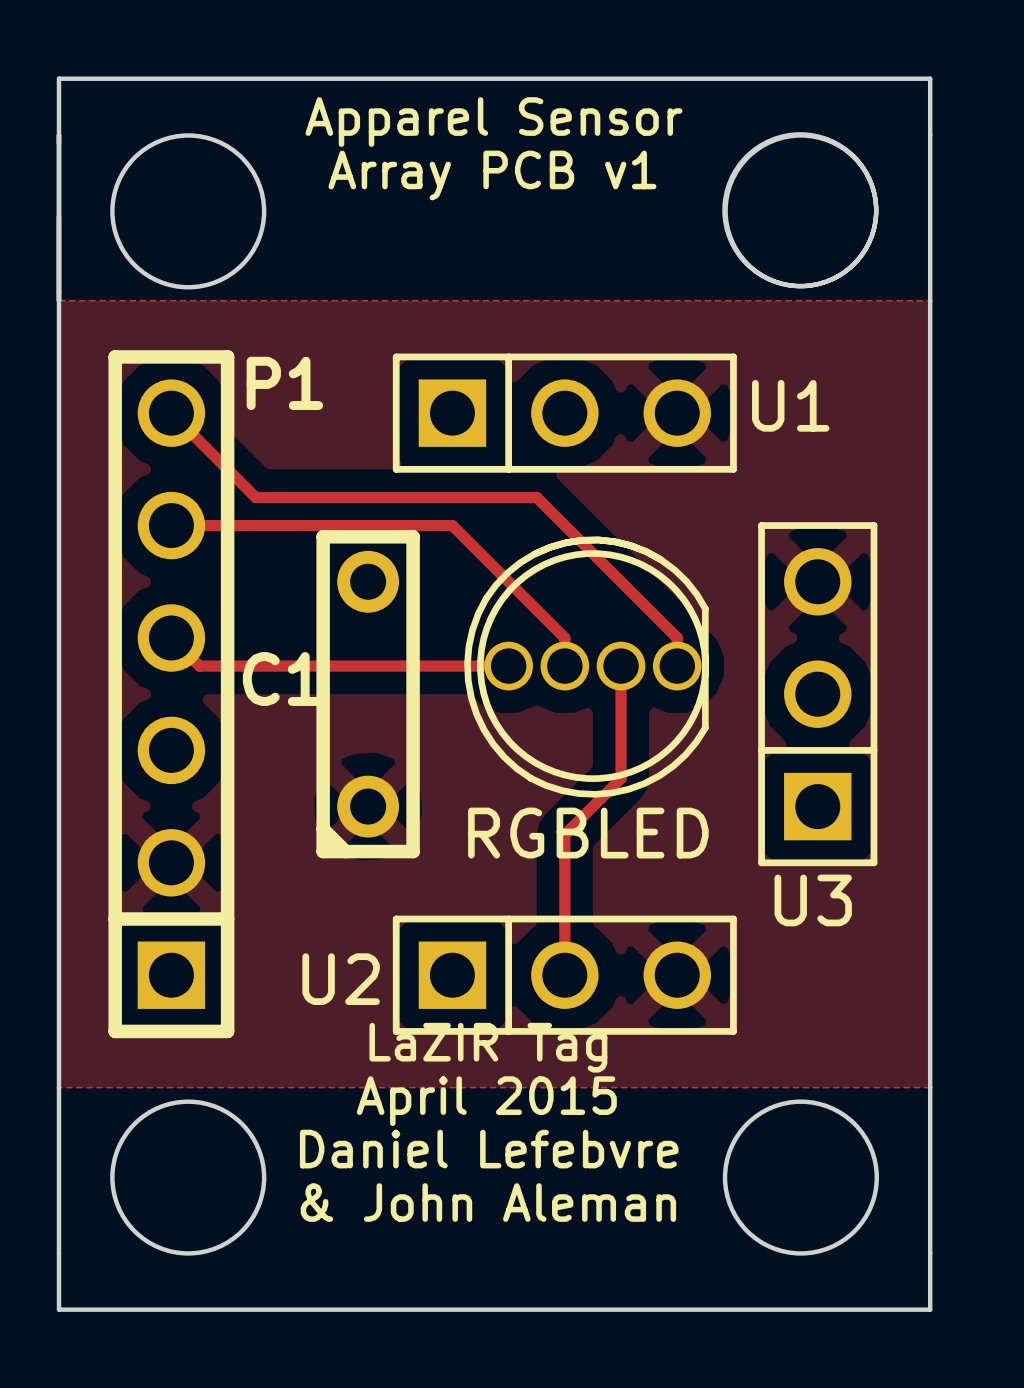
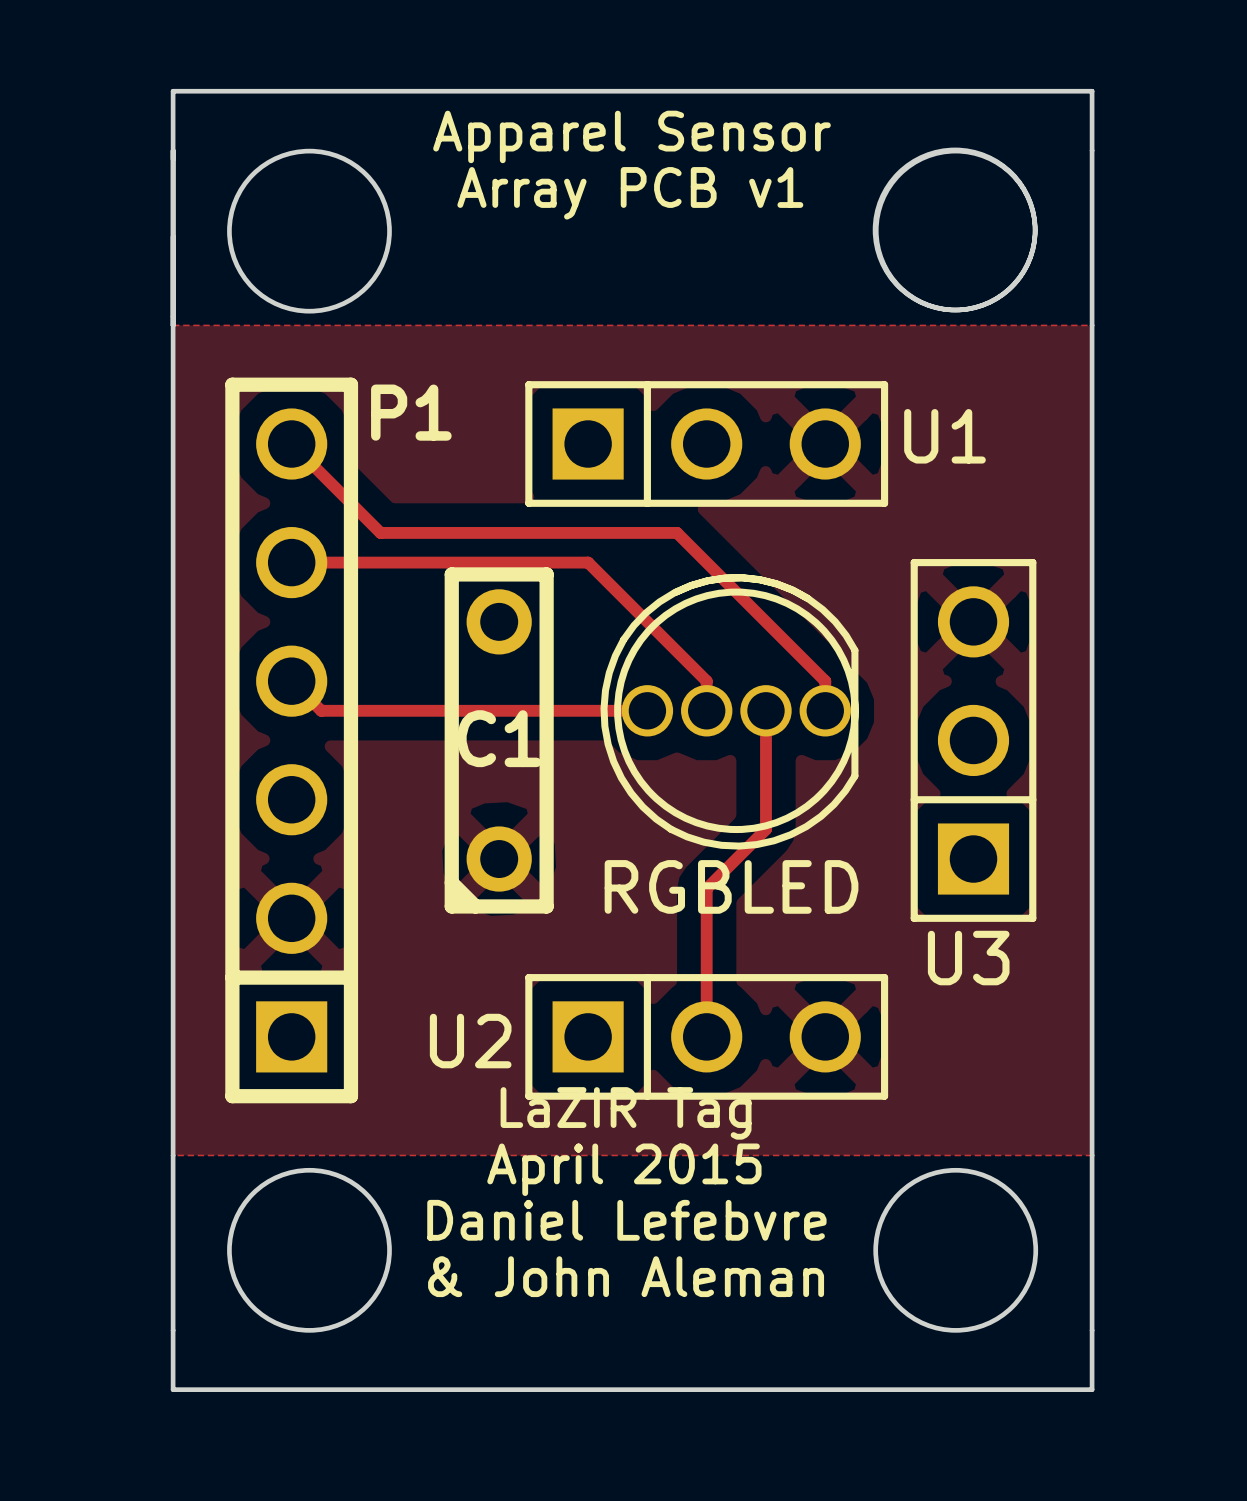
C1 name position: C1 (282, 679) -> C1 (499, 738)

